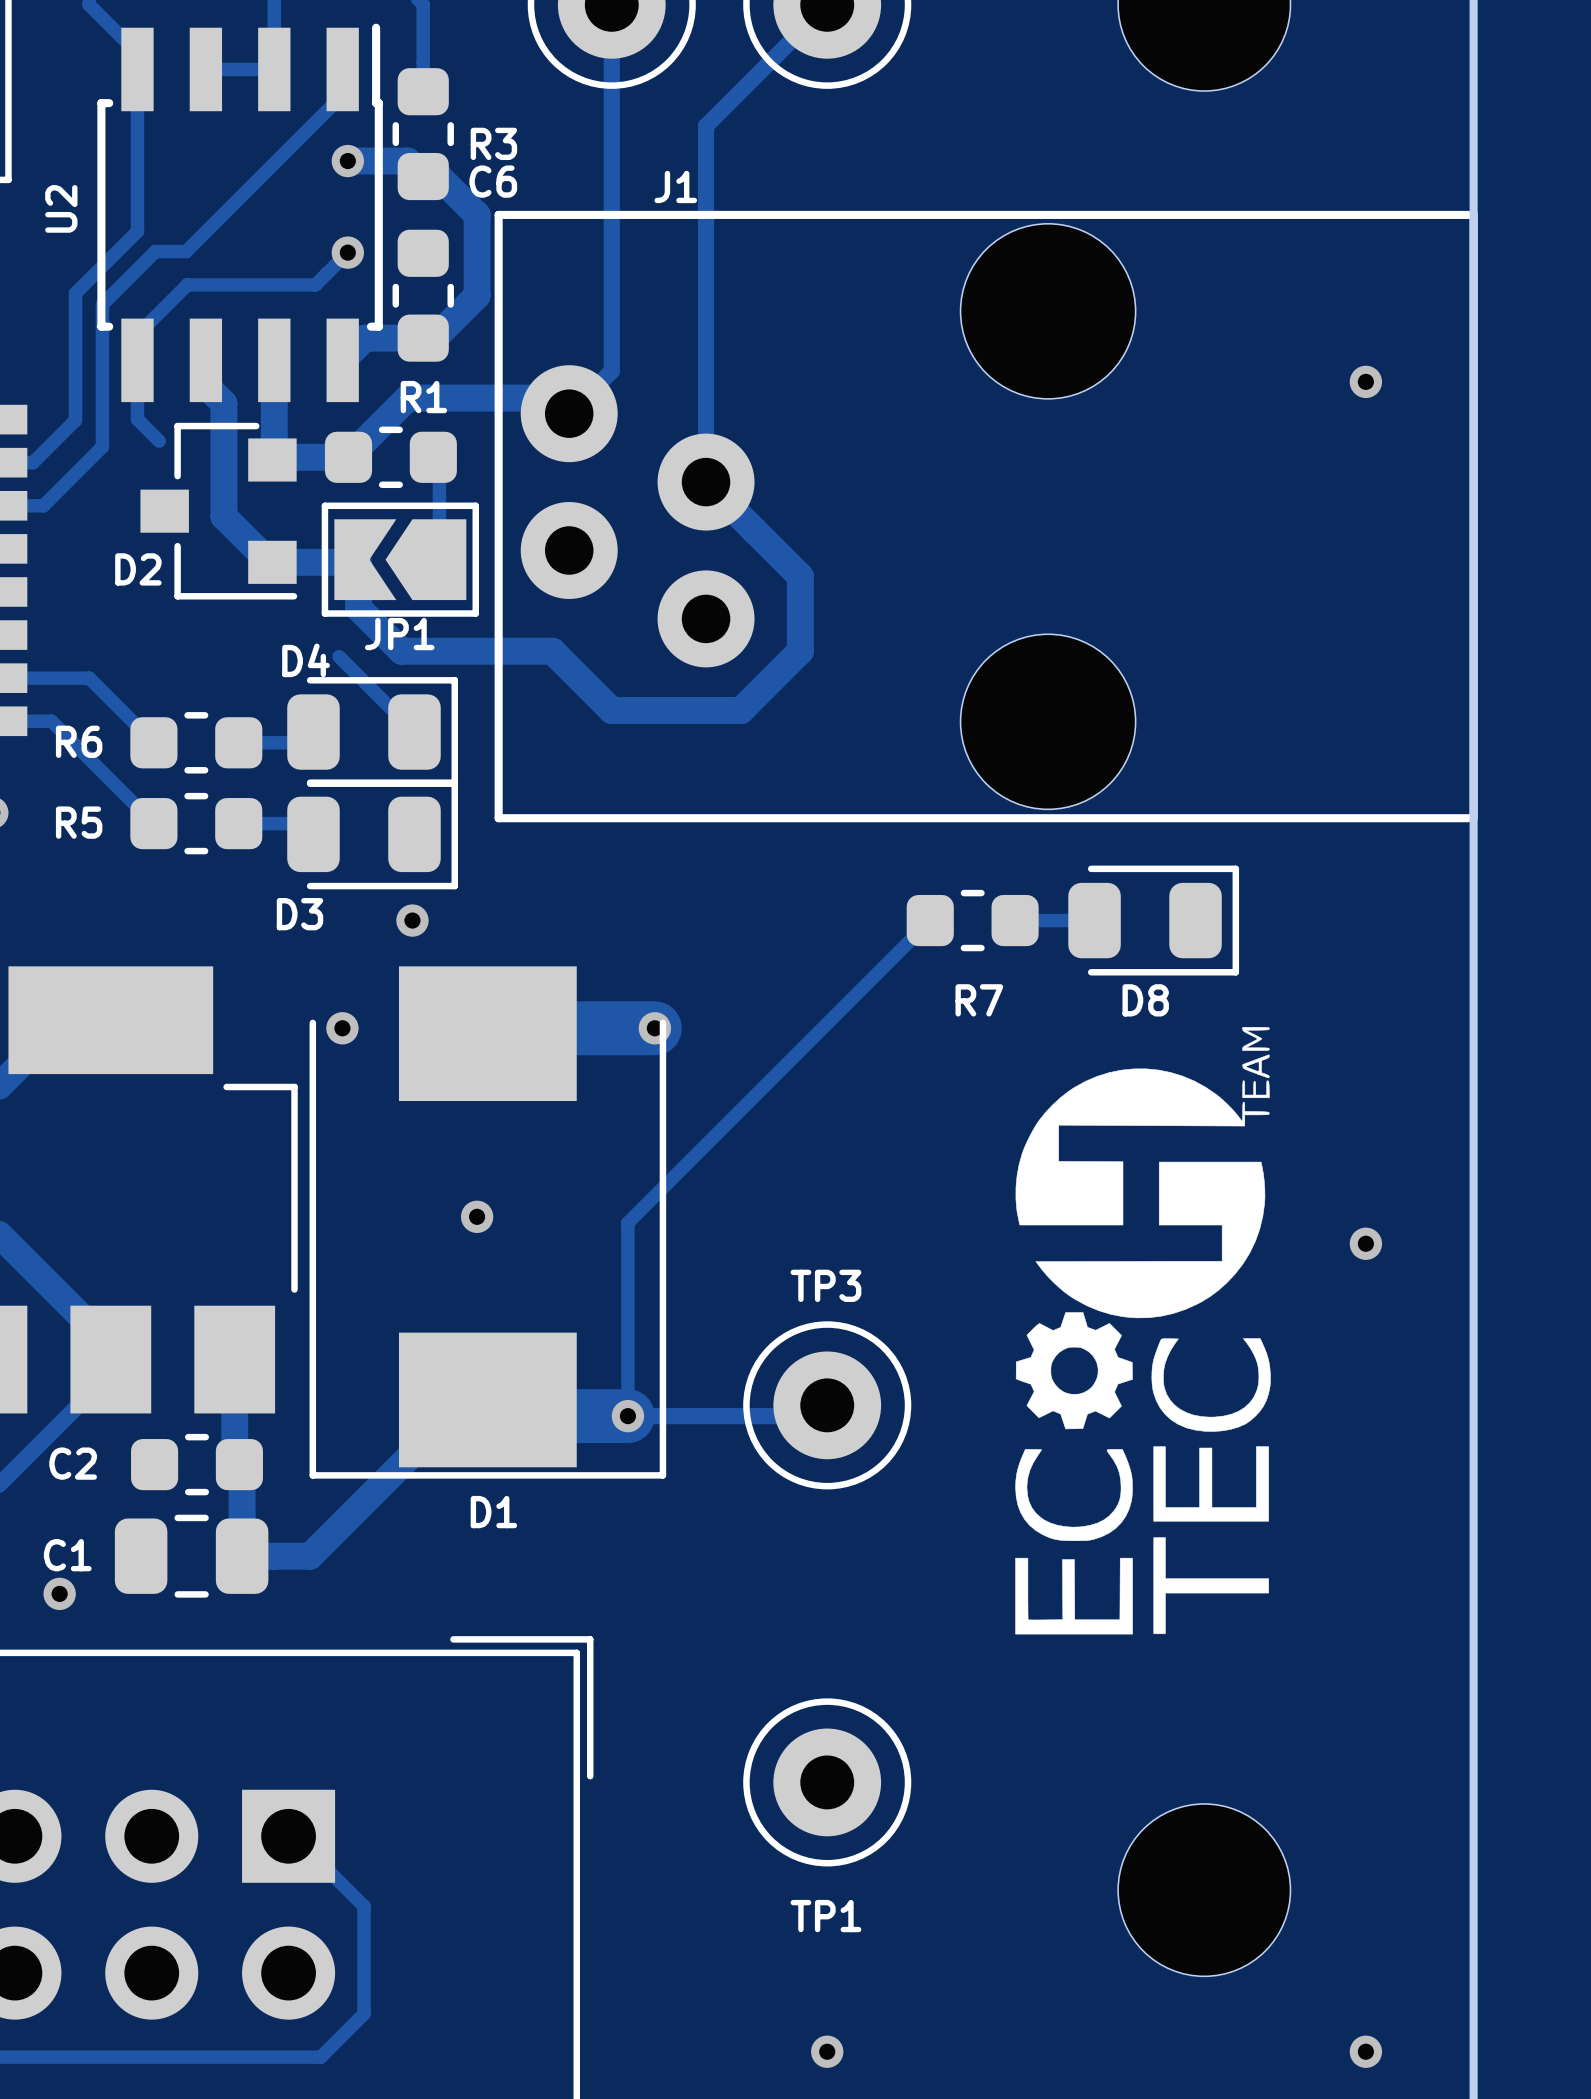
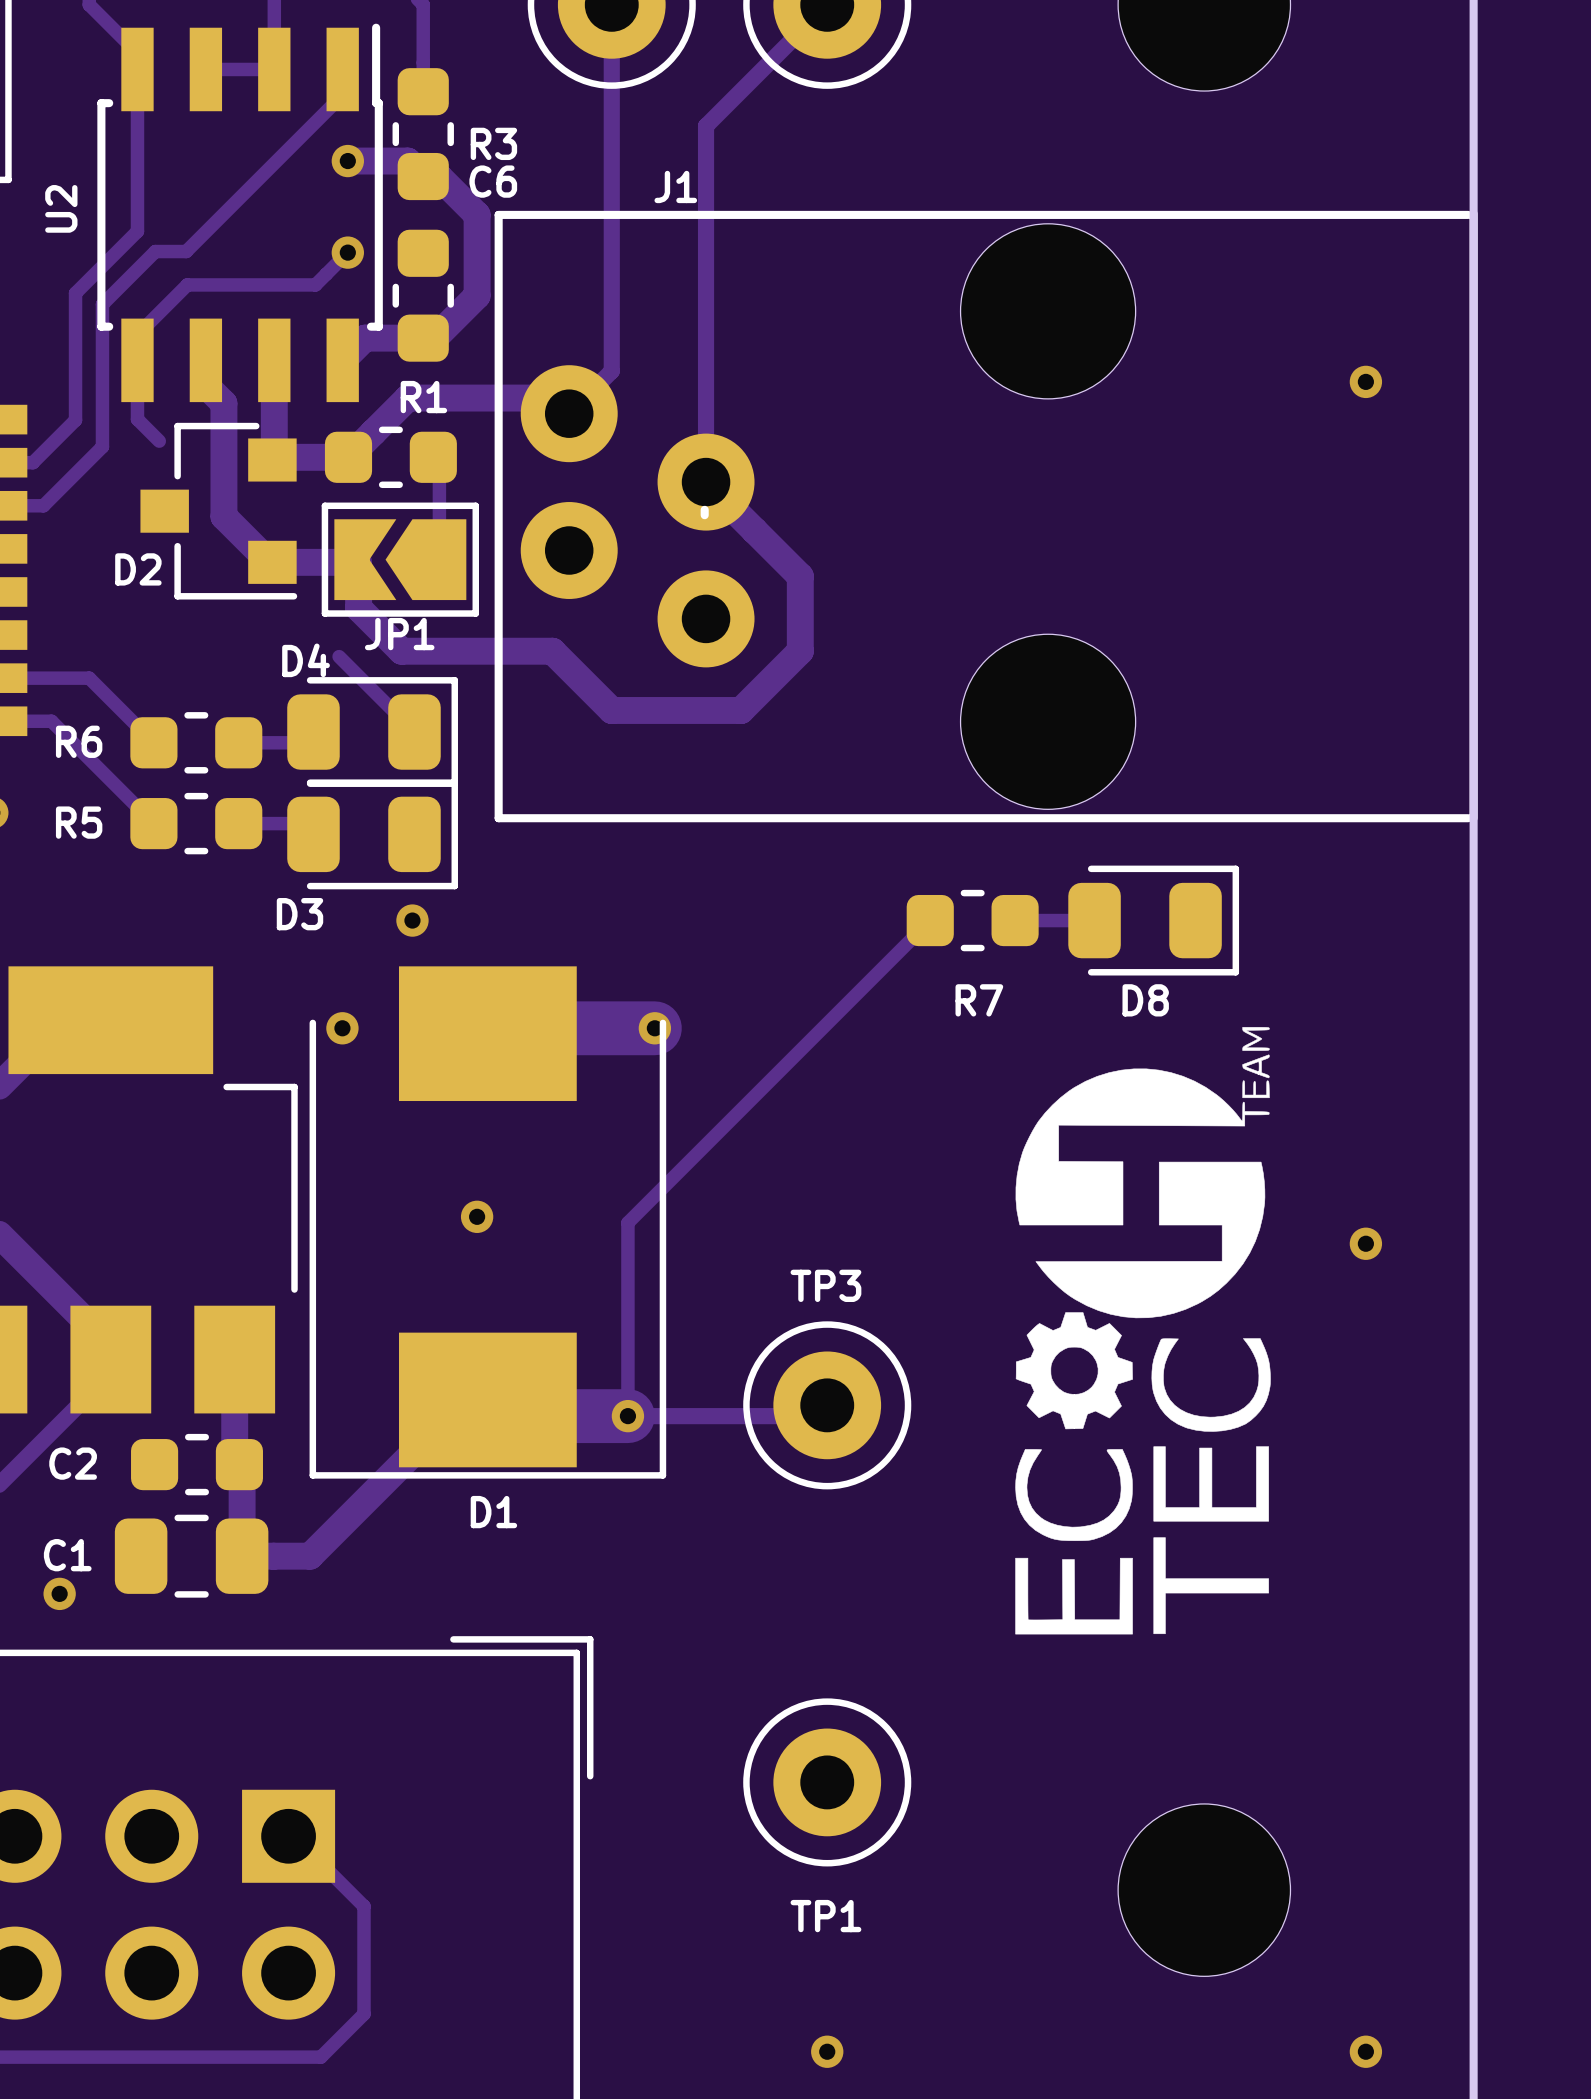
J1 footprint: [494, 209, 1478, 823] -> [494, 209, 1478, 823]

